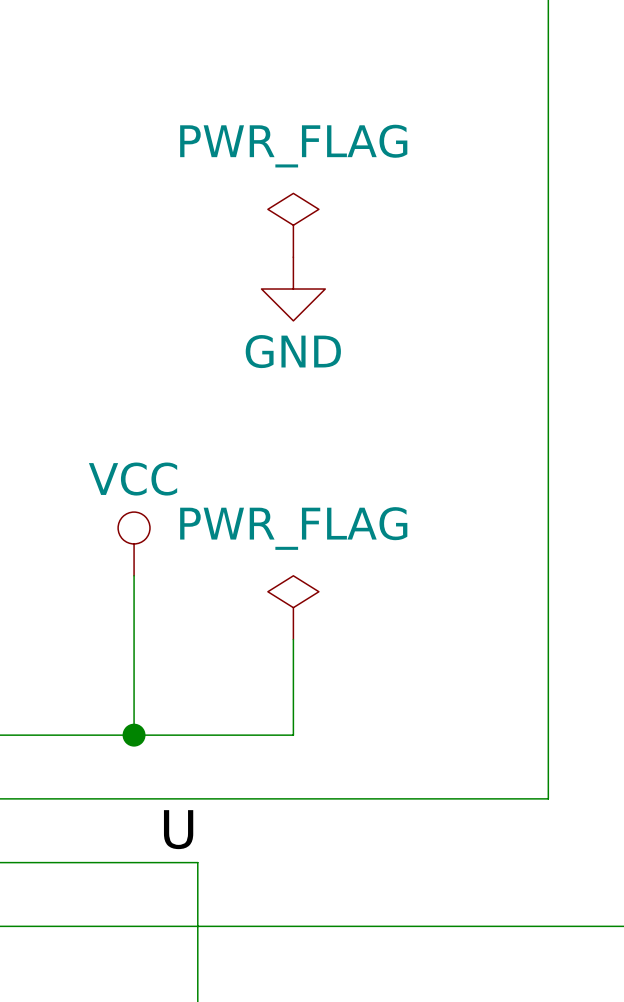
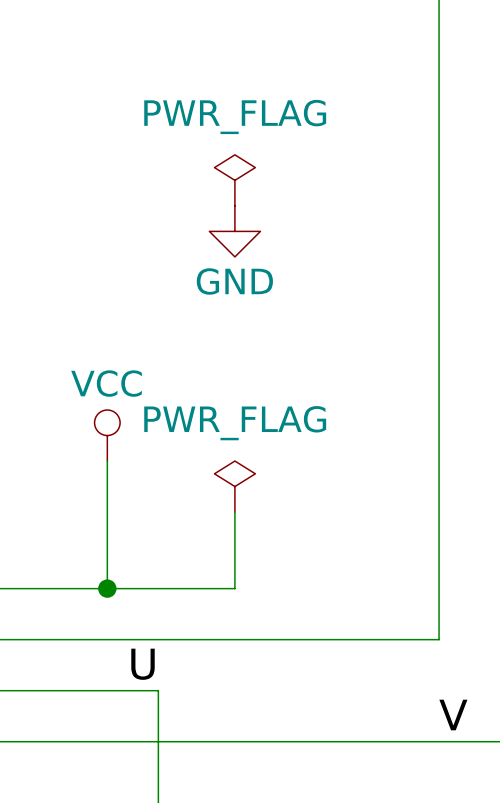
label: none -> V (453, 715)

